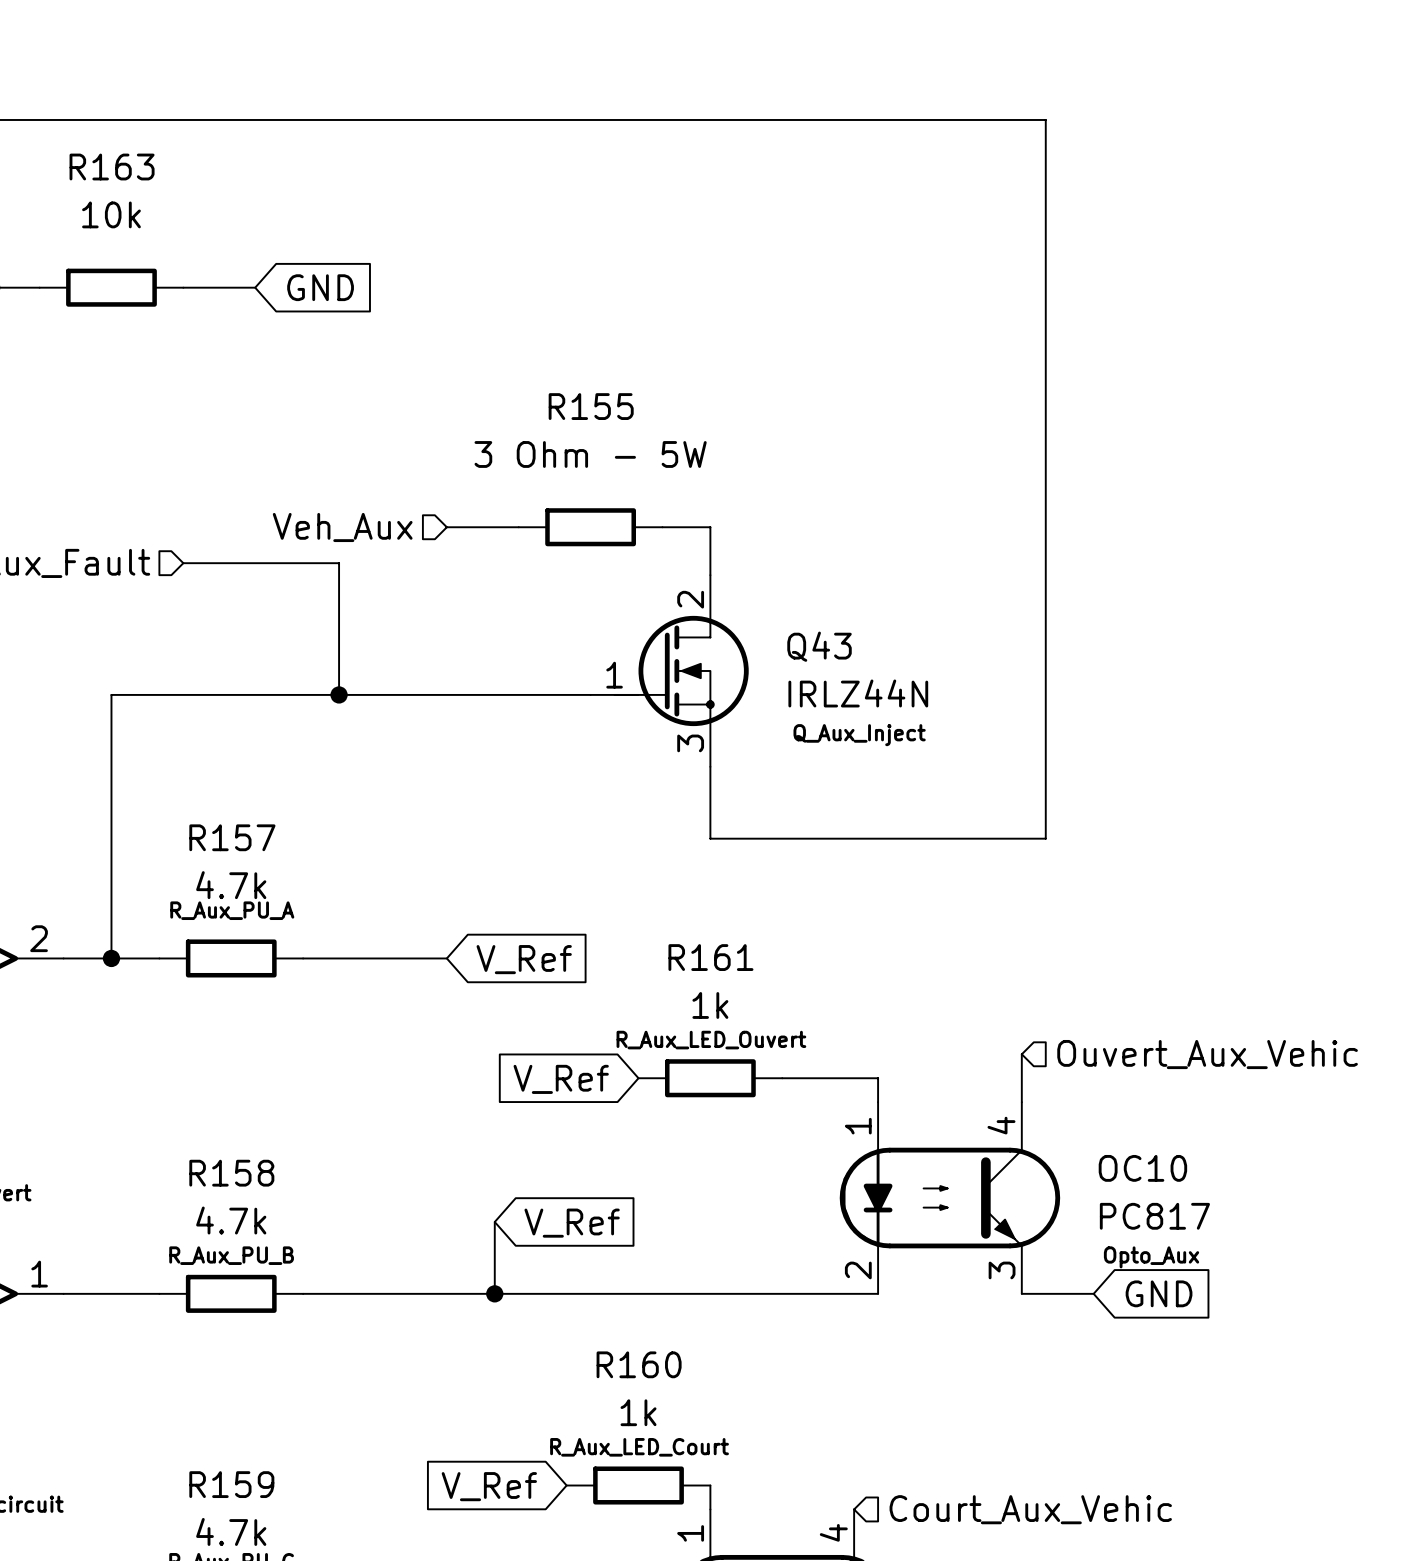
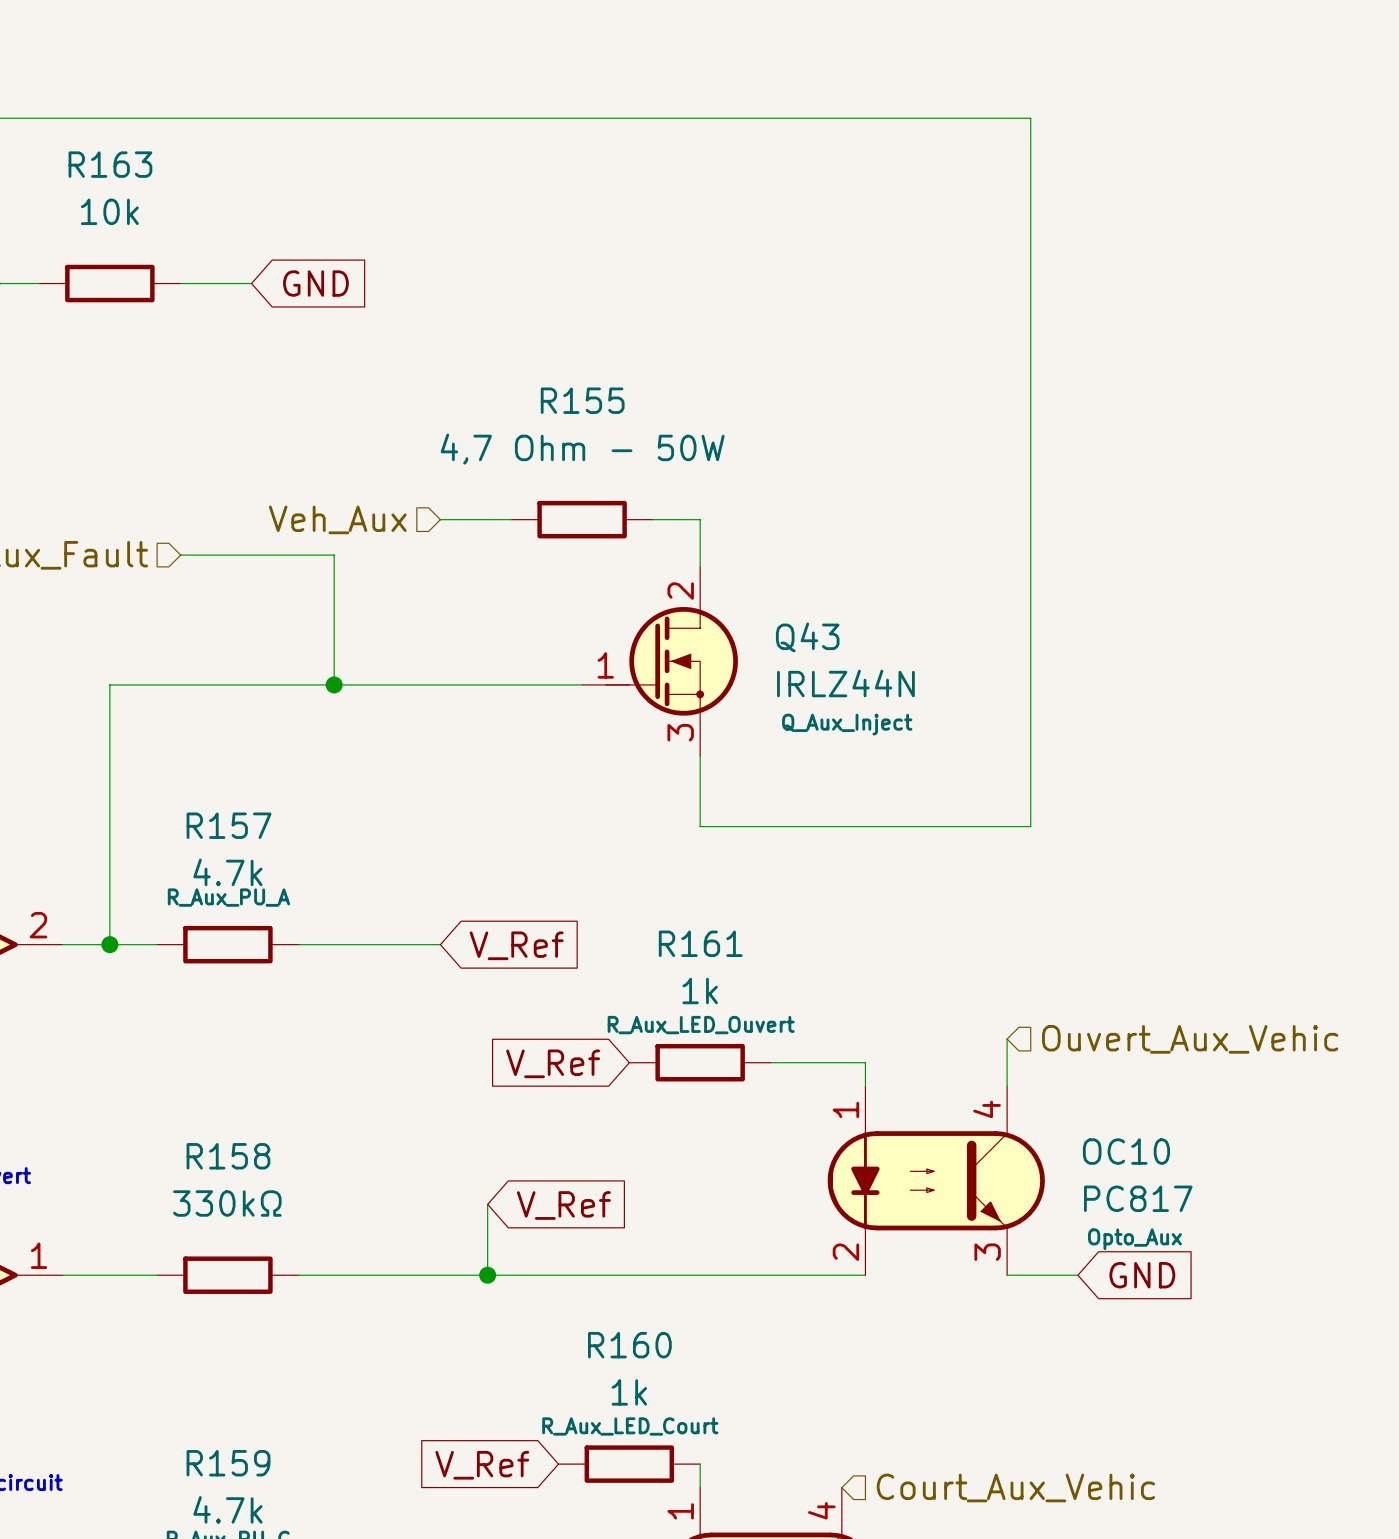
R155 value: 3 Ohm - 5W (590, 454) -> 4,7 Ohm - 50W (582, 449)
R158 value: 4.7k (231, 1220) -> 330kΩ (227, 1203)
R158 text: R_Aux_PU_B (231, 1255) -> none

